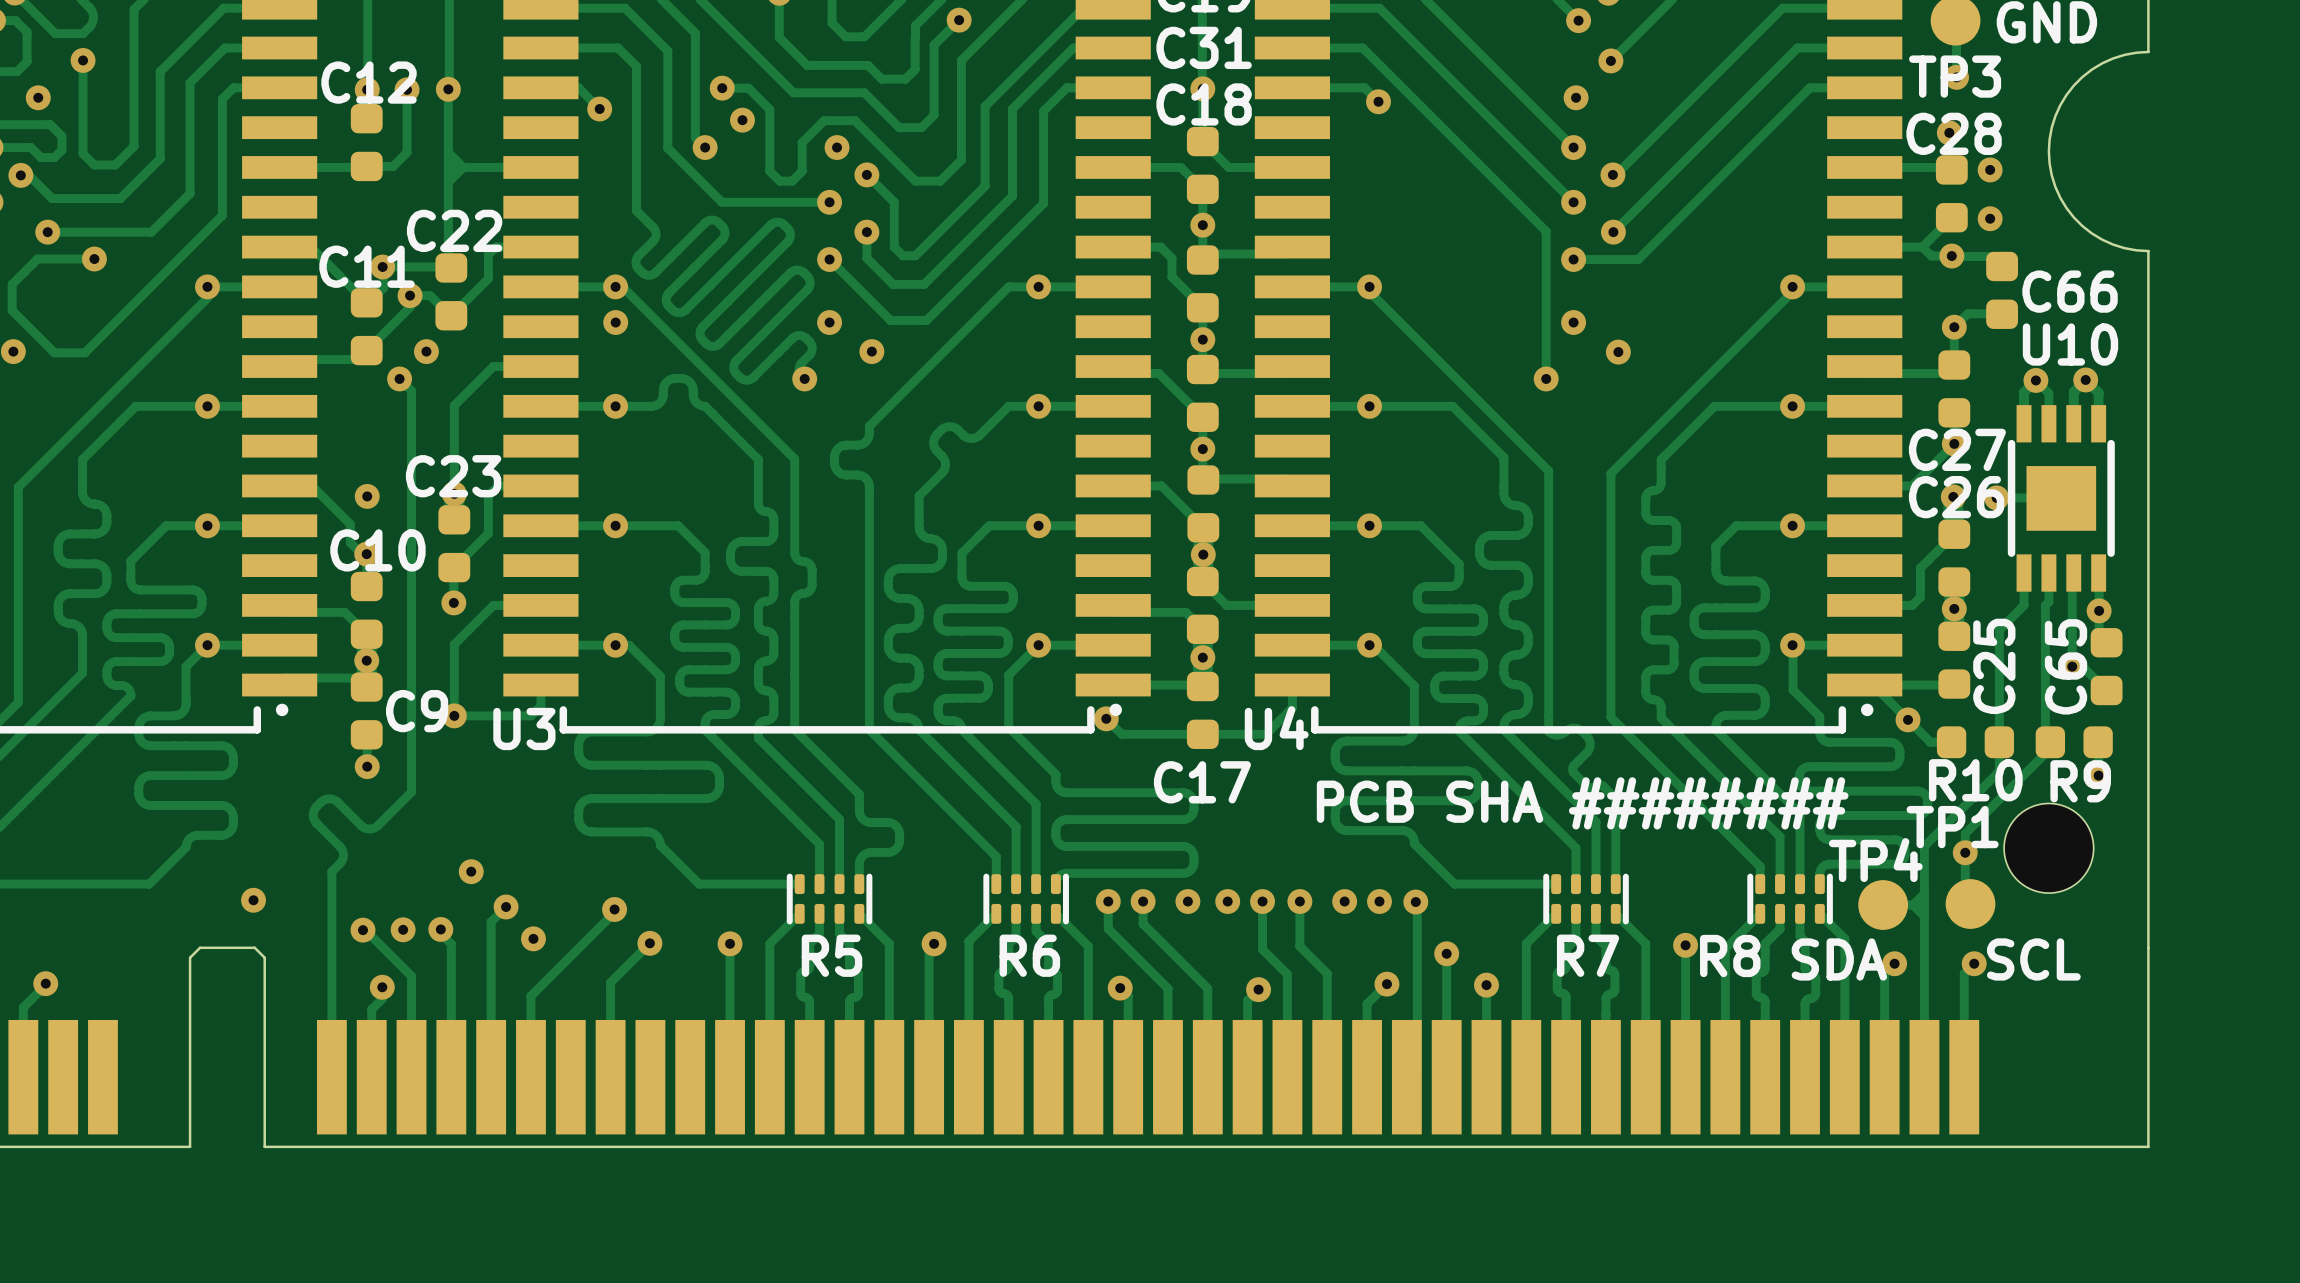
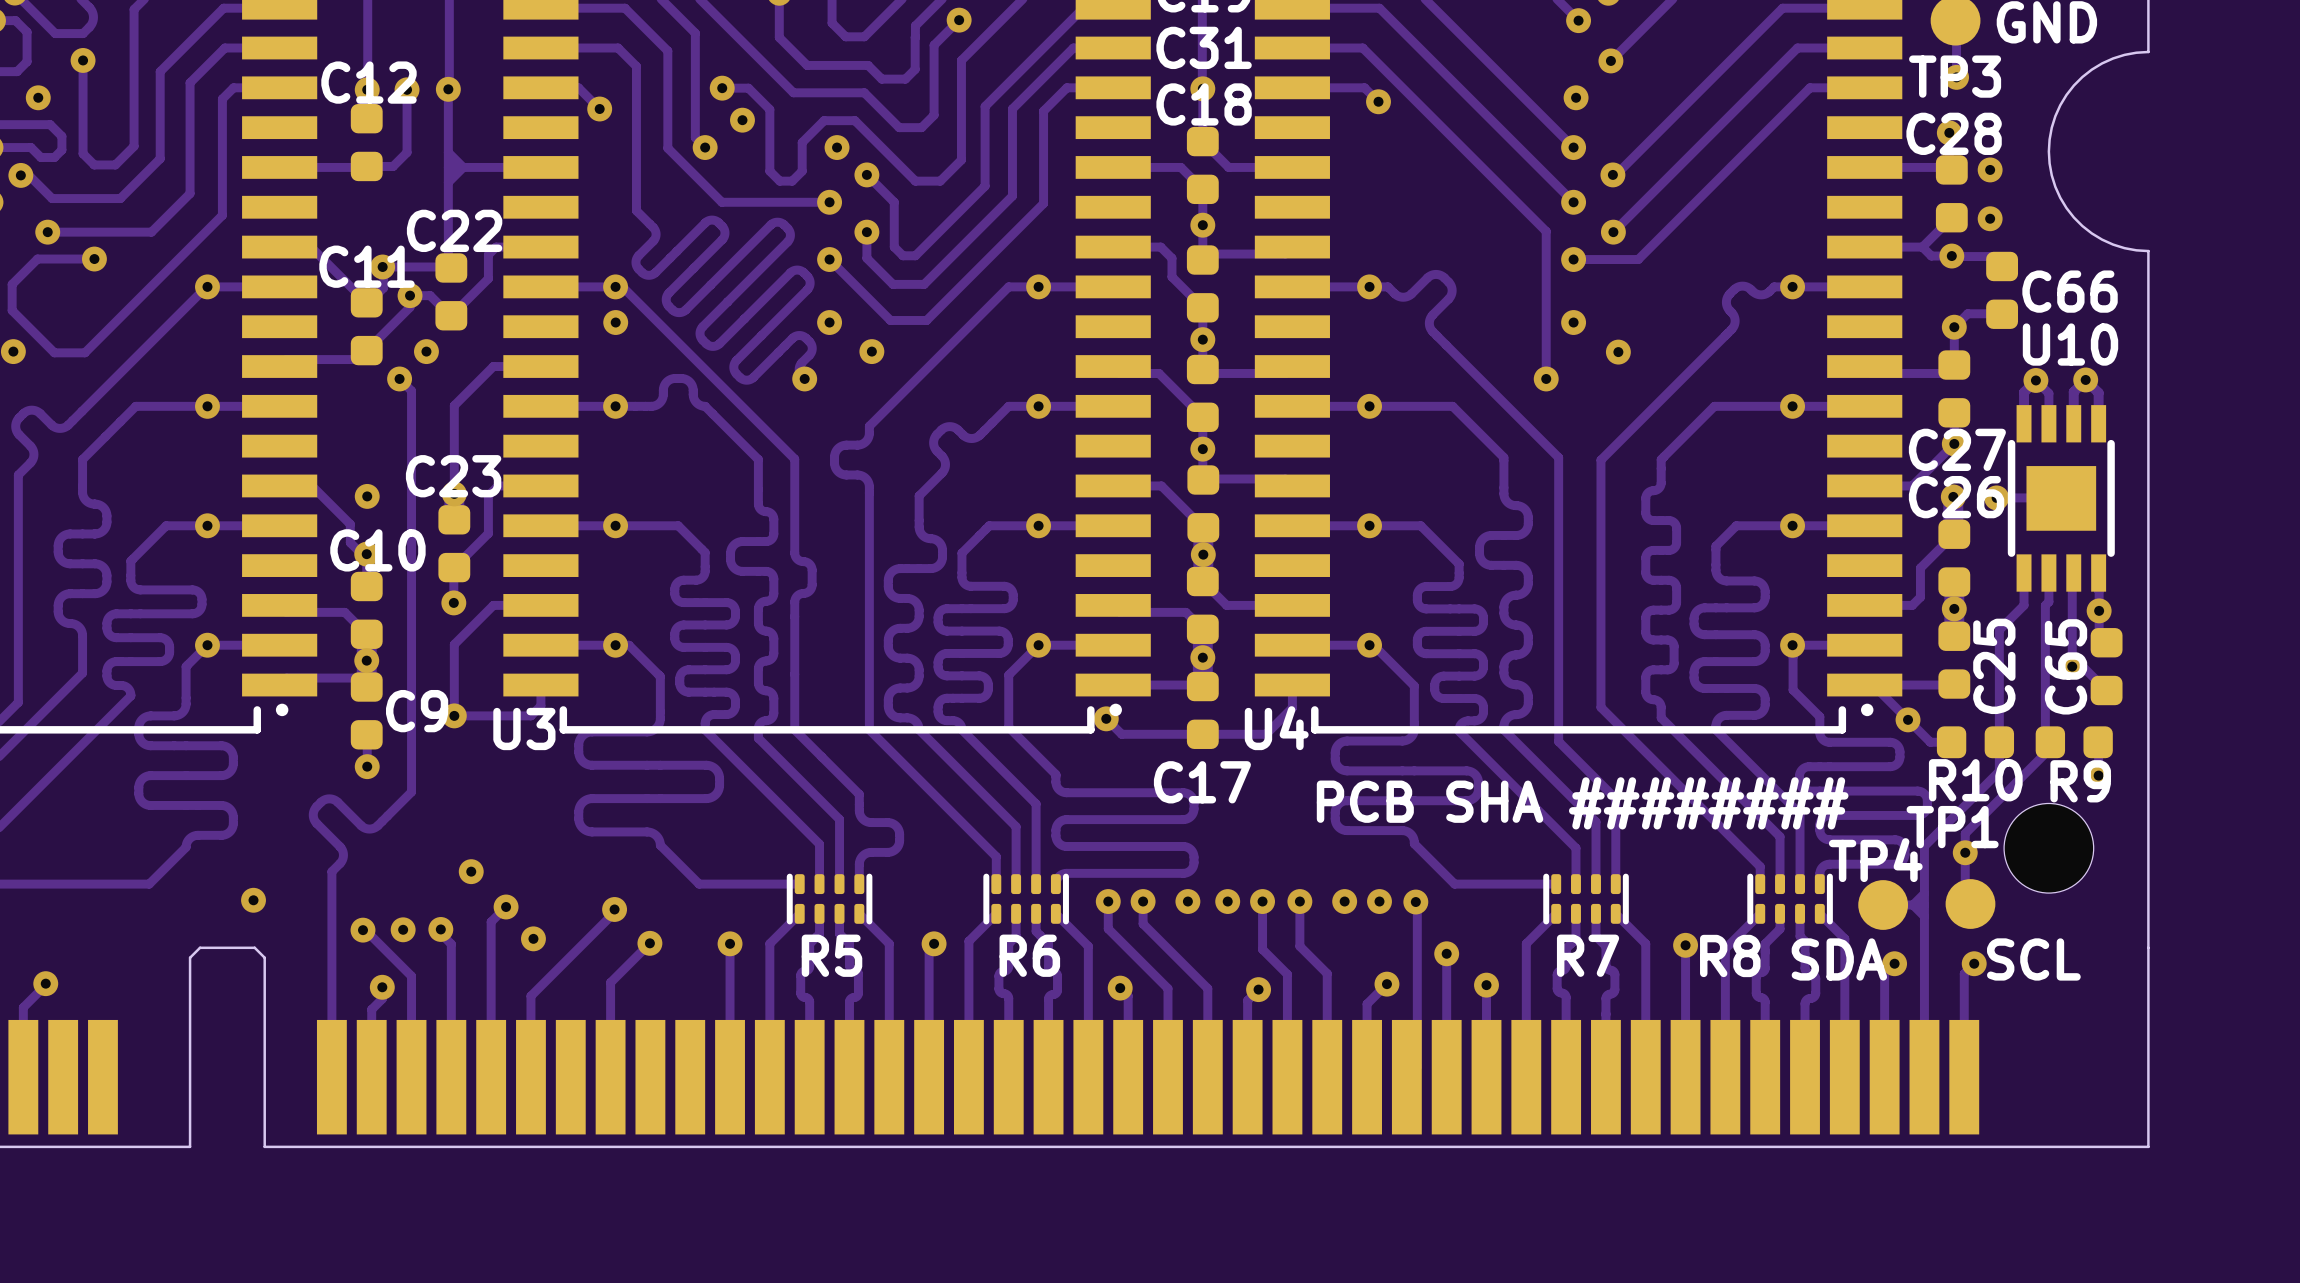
track: (207, 286) (207, 298) (18, 487) -> (206, 286) (66, 426) (54, 427) (39, 412) (33, 410) (25, 411) (19, 417) (16, 423) (16, 430) (31, 447) (33, 454) (31, 461) (18, 475) (18, 487)
track: (1369, 286) (1369, 291) (1548, 471) (1548, 731) (1558, 735) (1574, 728) (1582, 731) (1589, 739) (1589, 747) (1573, 766) (1572, 771) (1588, 787) (1592, 787) (1598, 784) (1603, 786) -> (1369, 286) (1387, 286) (1397, 295) (1404, 297) (1410, 294) (1431, 275) (1439, 274) (1444, 277) (1451, 286) (1451, 293) (1430, 317) (1429, 323) (1430, 329) (1558, 457) (1558, 741) (1603, 786)
track: (1797, 286) (1610, 473) (1610, 717) -> (1797, 286) (1774, 286) (1767, 293) (1761, 294) (1745, 286) (1735, 288) (1726, 300) (1727, 307) (1734, 317) (1732, 328) (1600, 460) (1600, 707) (1610, 717)

